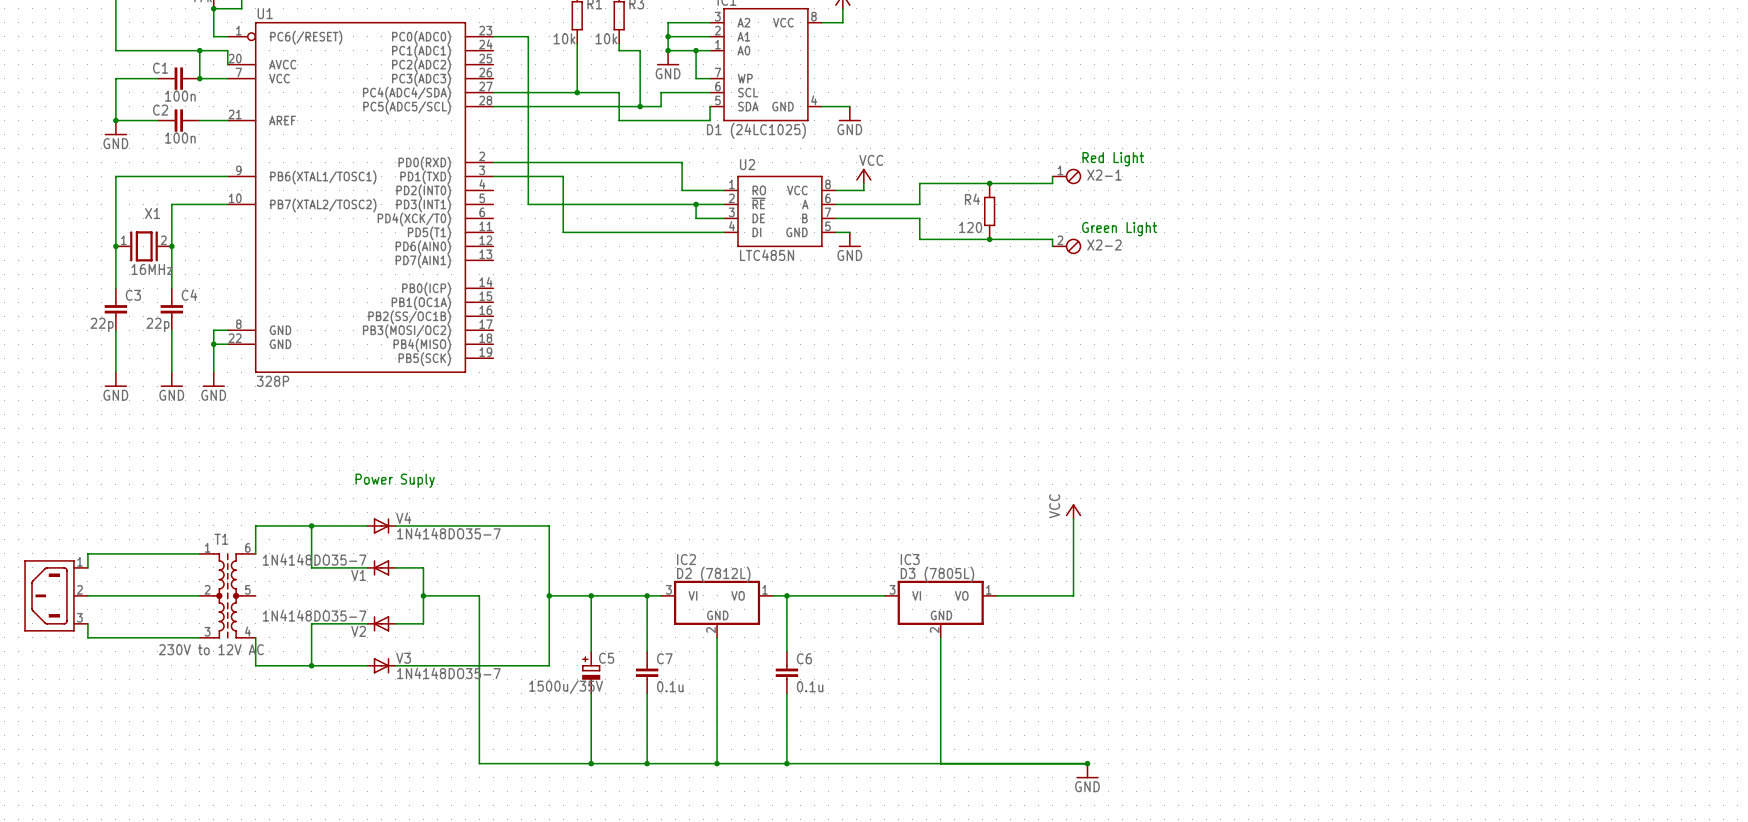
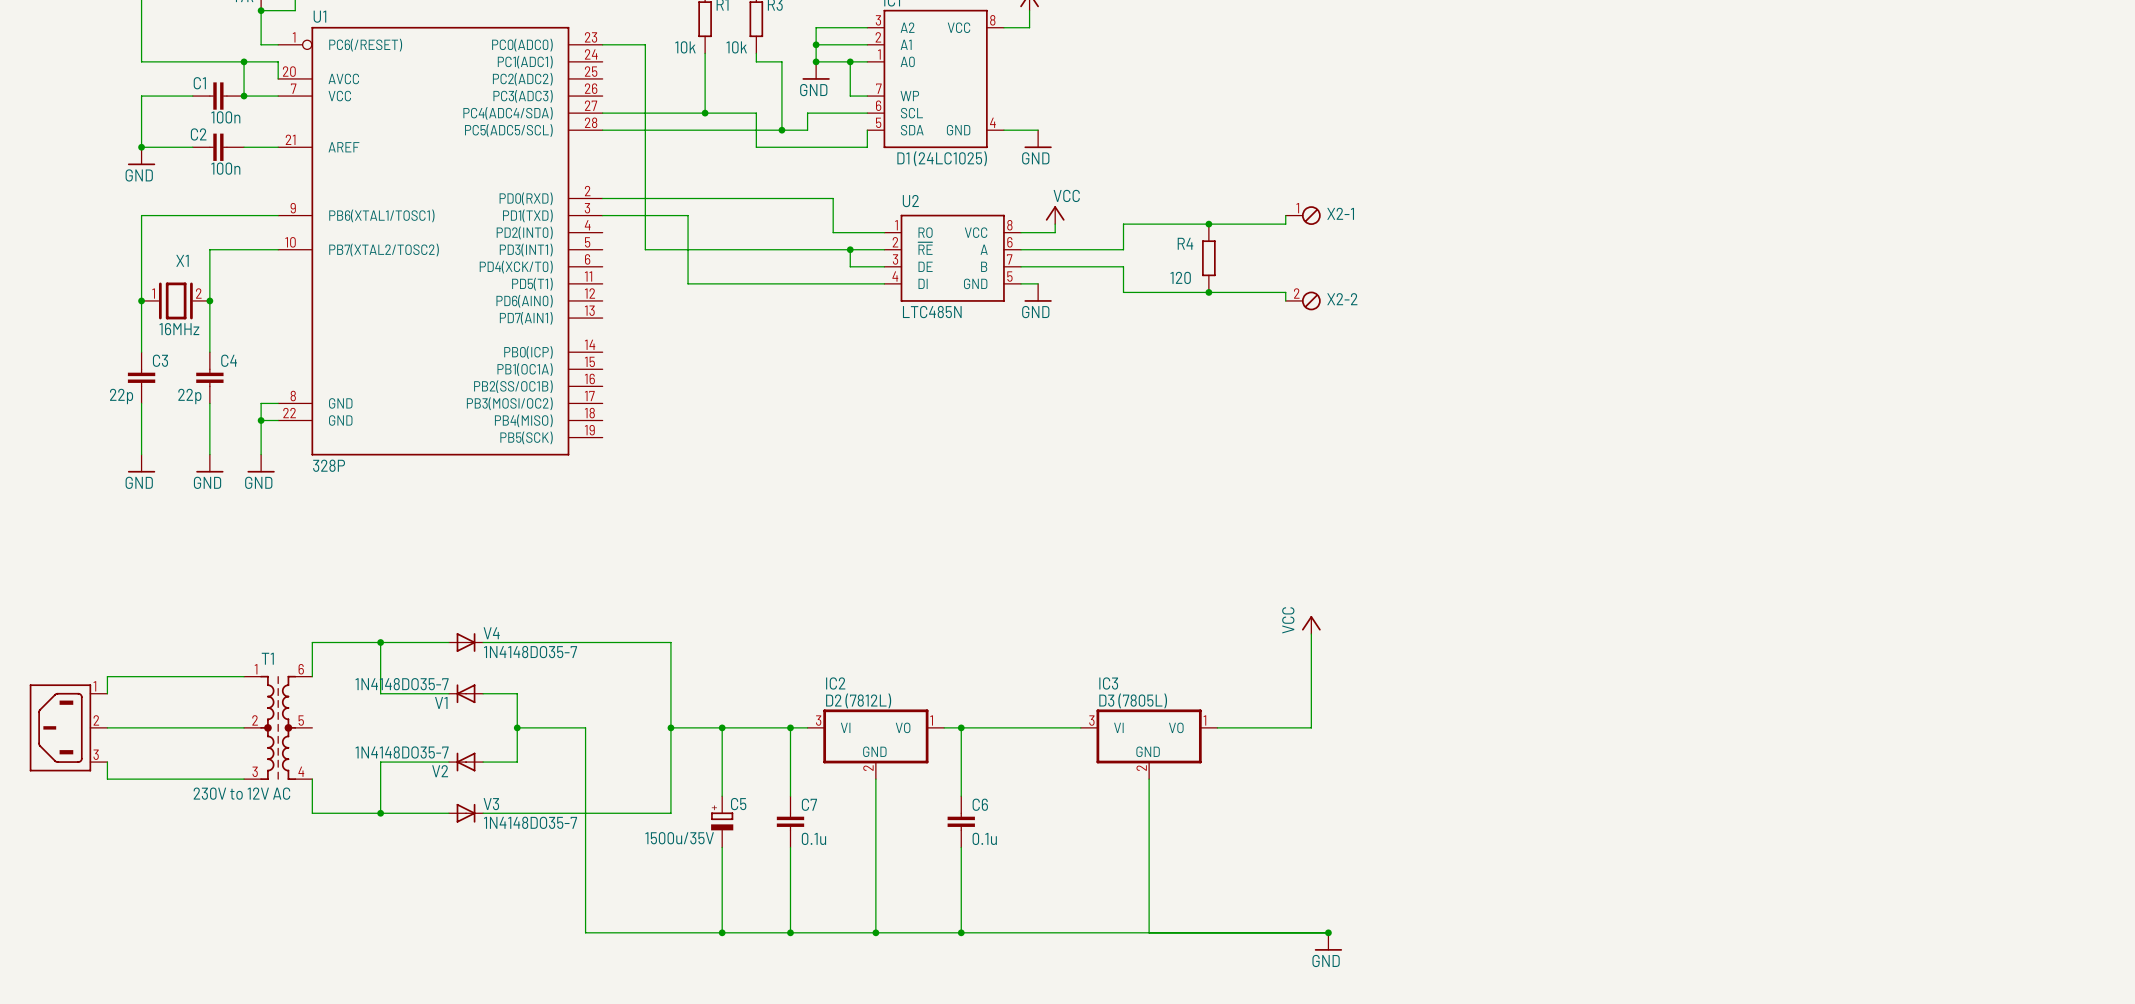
text: Red Light (1113, 159) -> none
text: Green Light (1119, 229) -> none
text: Power Suply (395, 480) -> none

